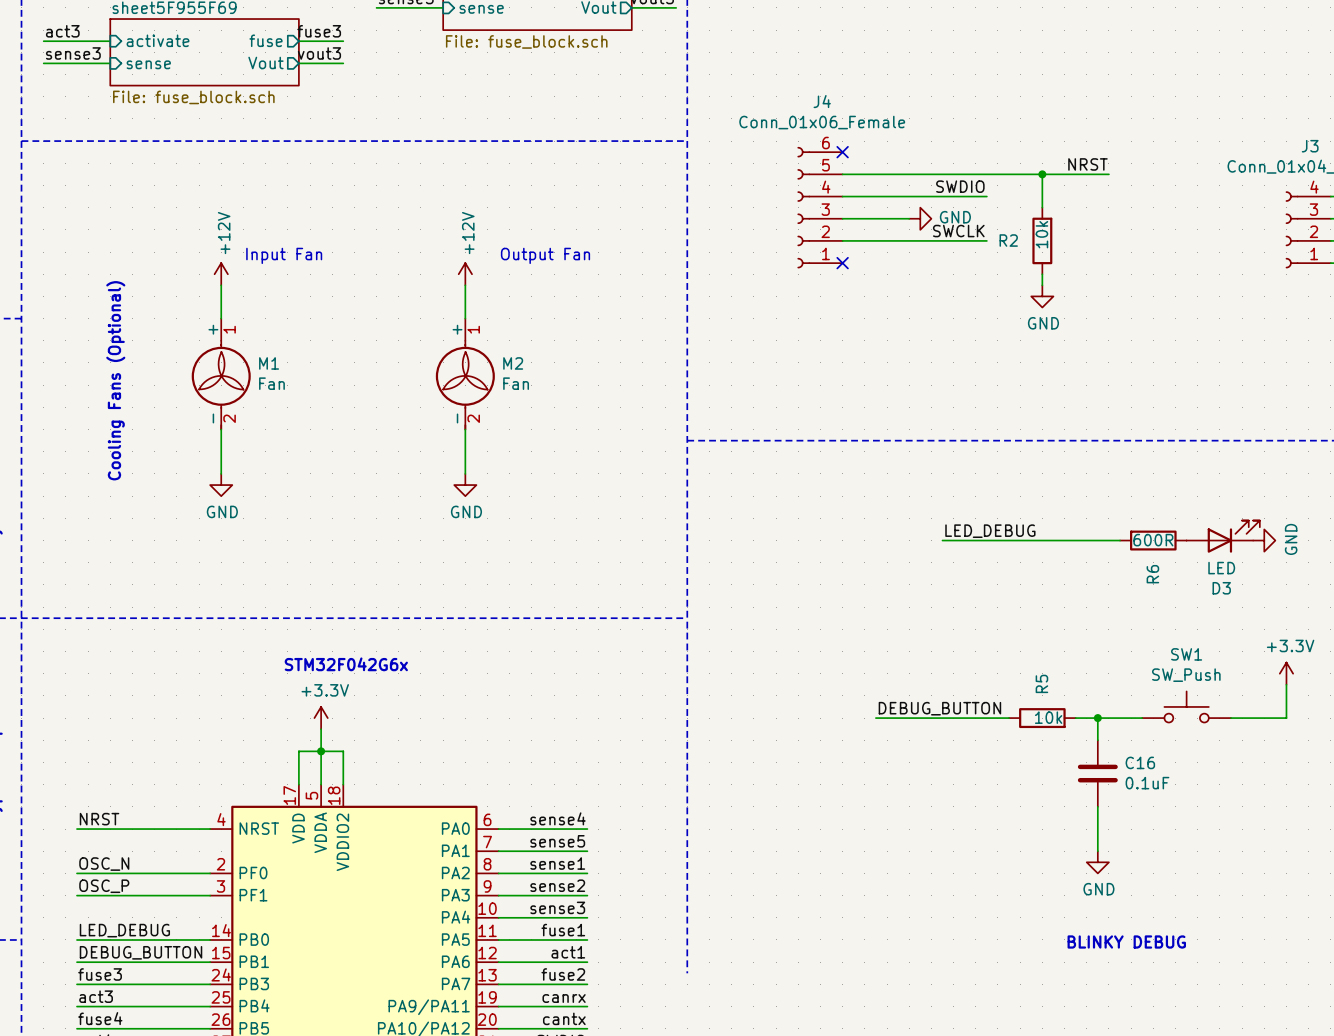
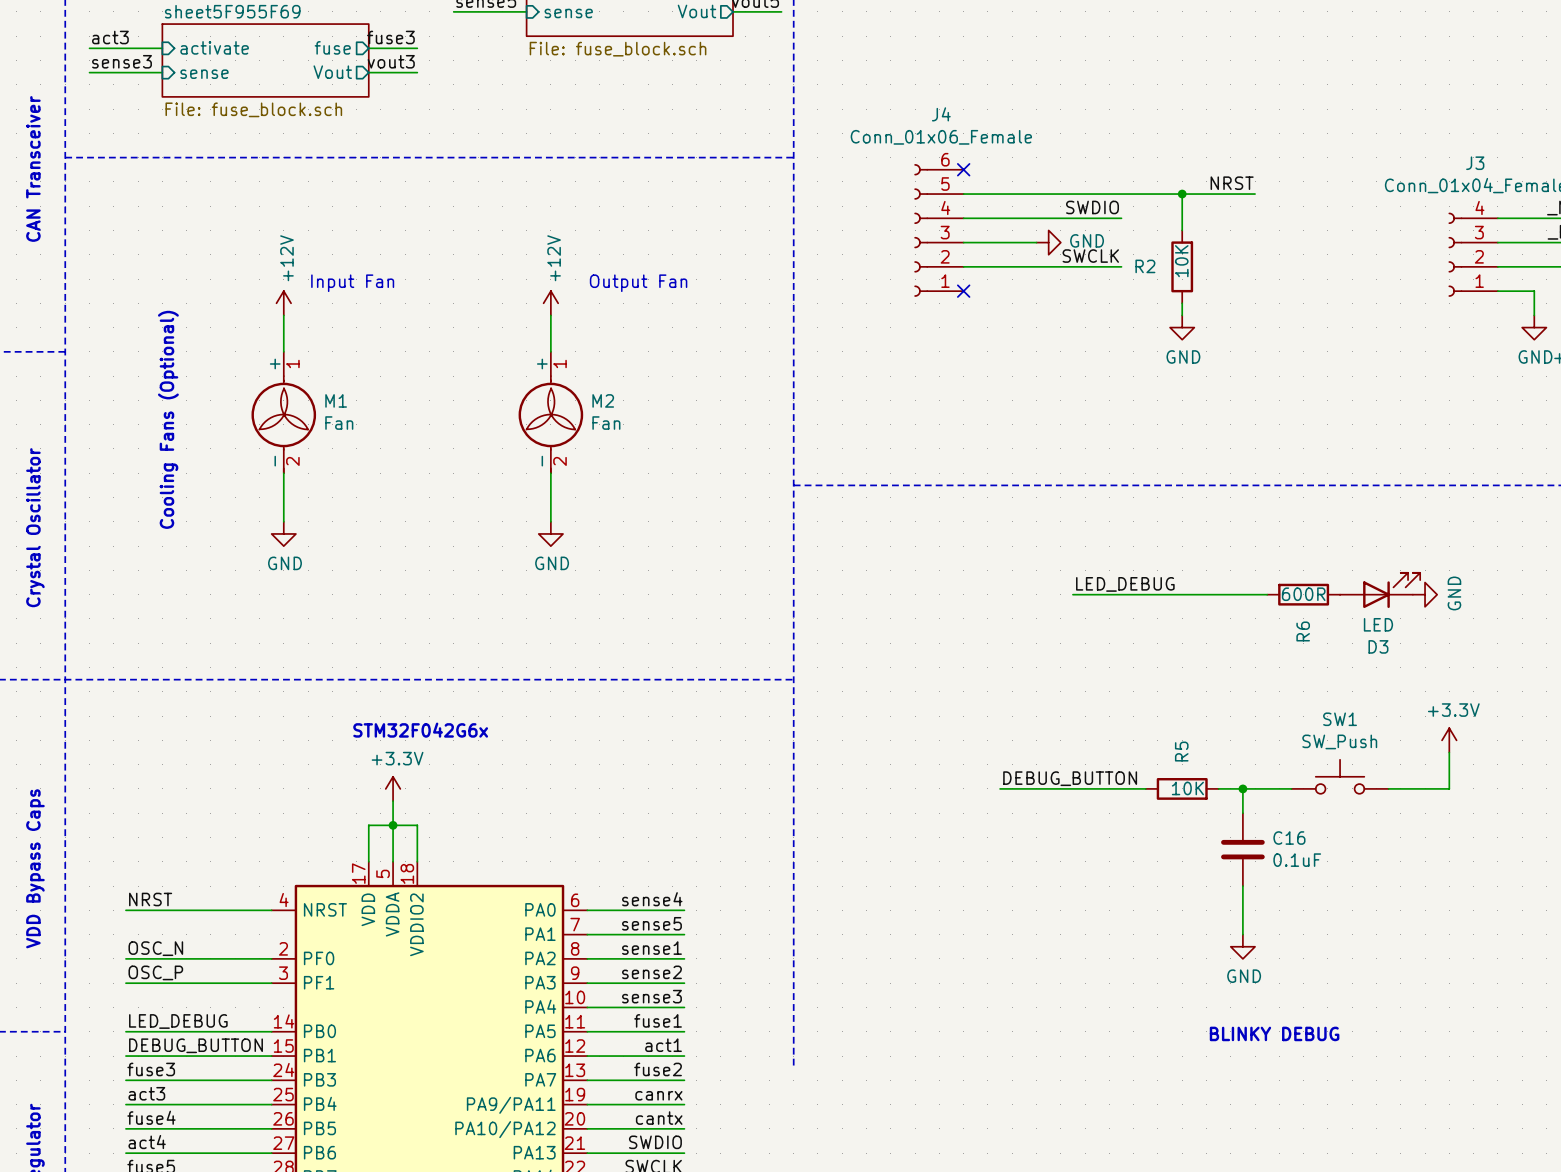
R2 value: 10k (1041, 234) -> 10K (1181, 261)
R5 value: 10k (1048, 717) -> 10K (1187, 788)

